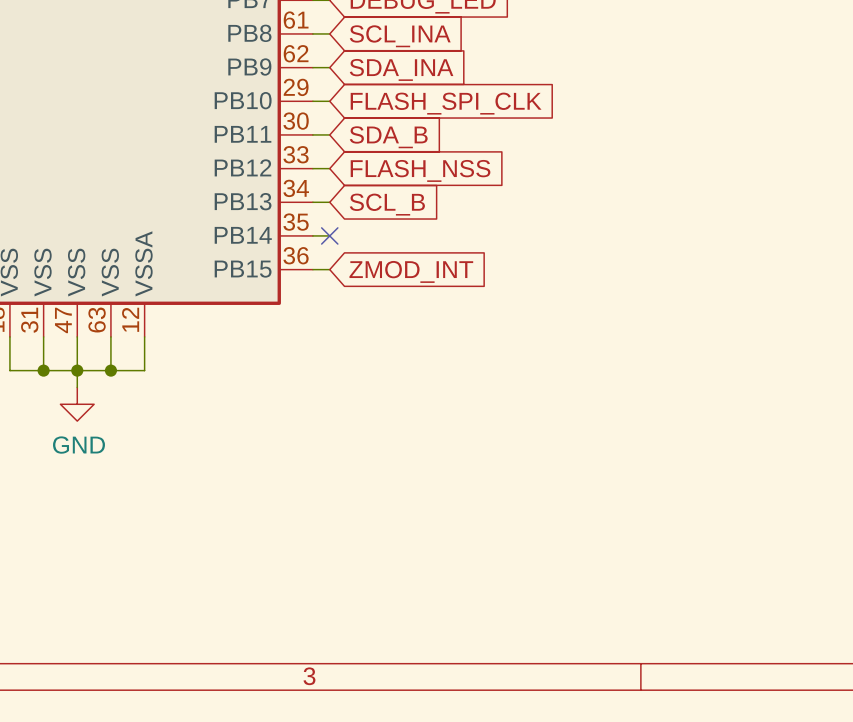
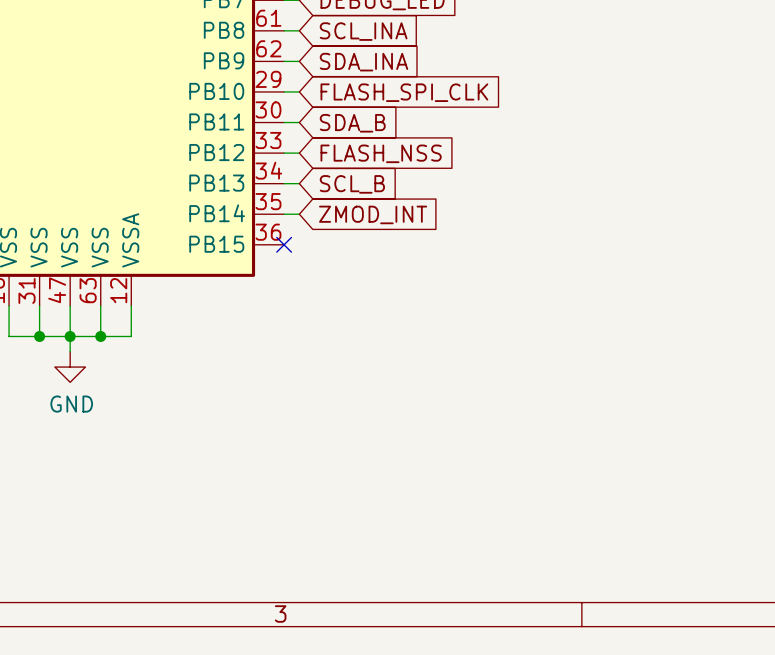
no-connect mark position: (329, 235) -> (284, 244)
wire: (312, 269) (329, 269) -> none
global label position: ZMOD_INT (411, 271) -> ZMOD_INT (373, 214)

